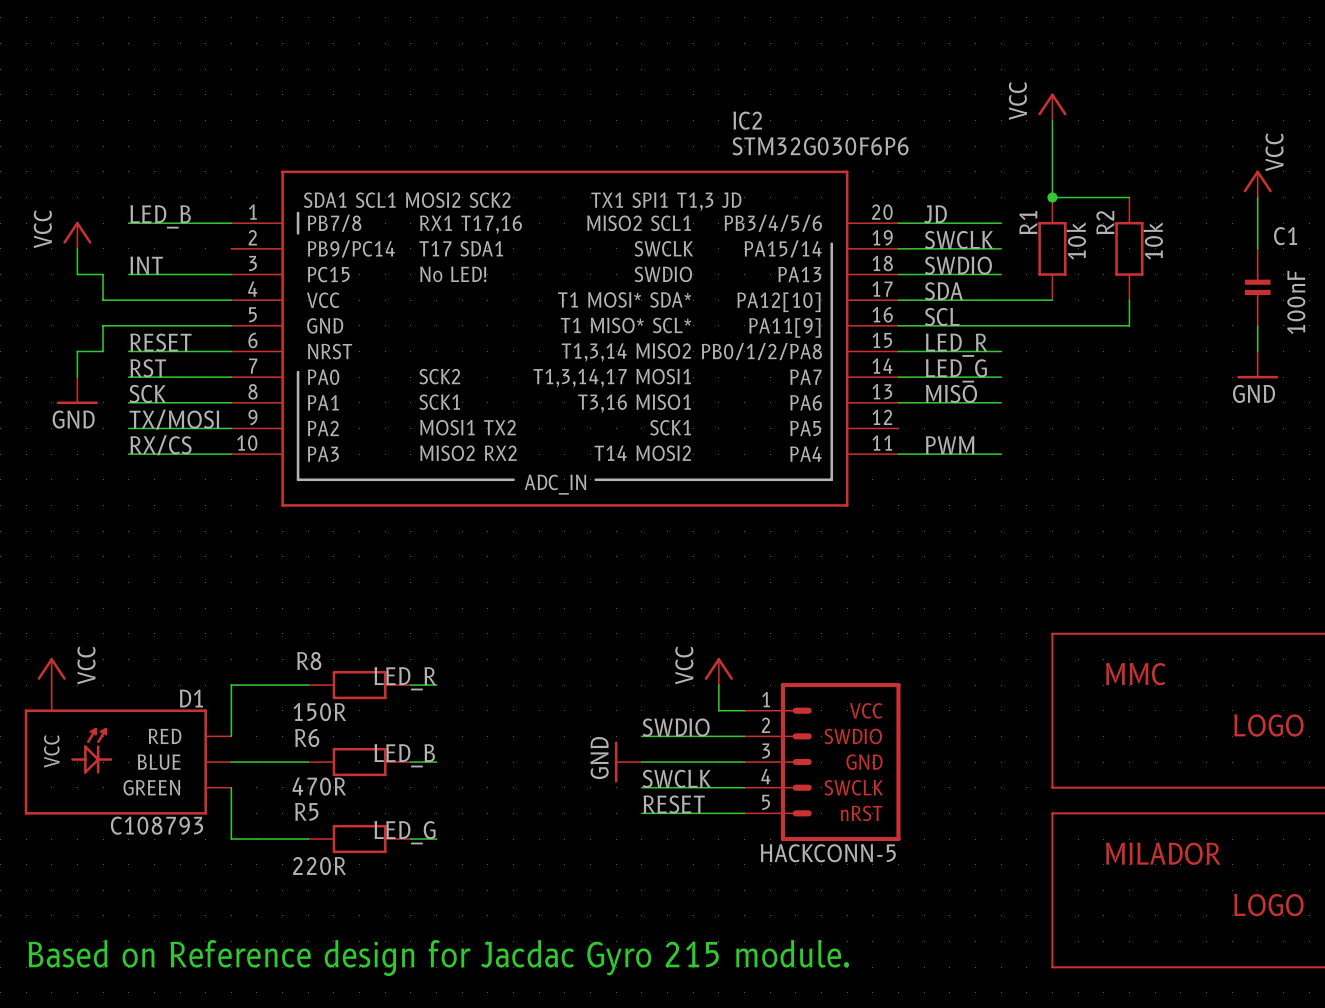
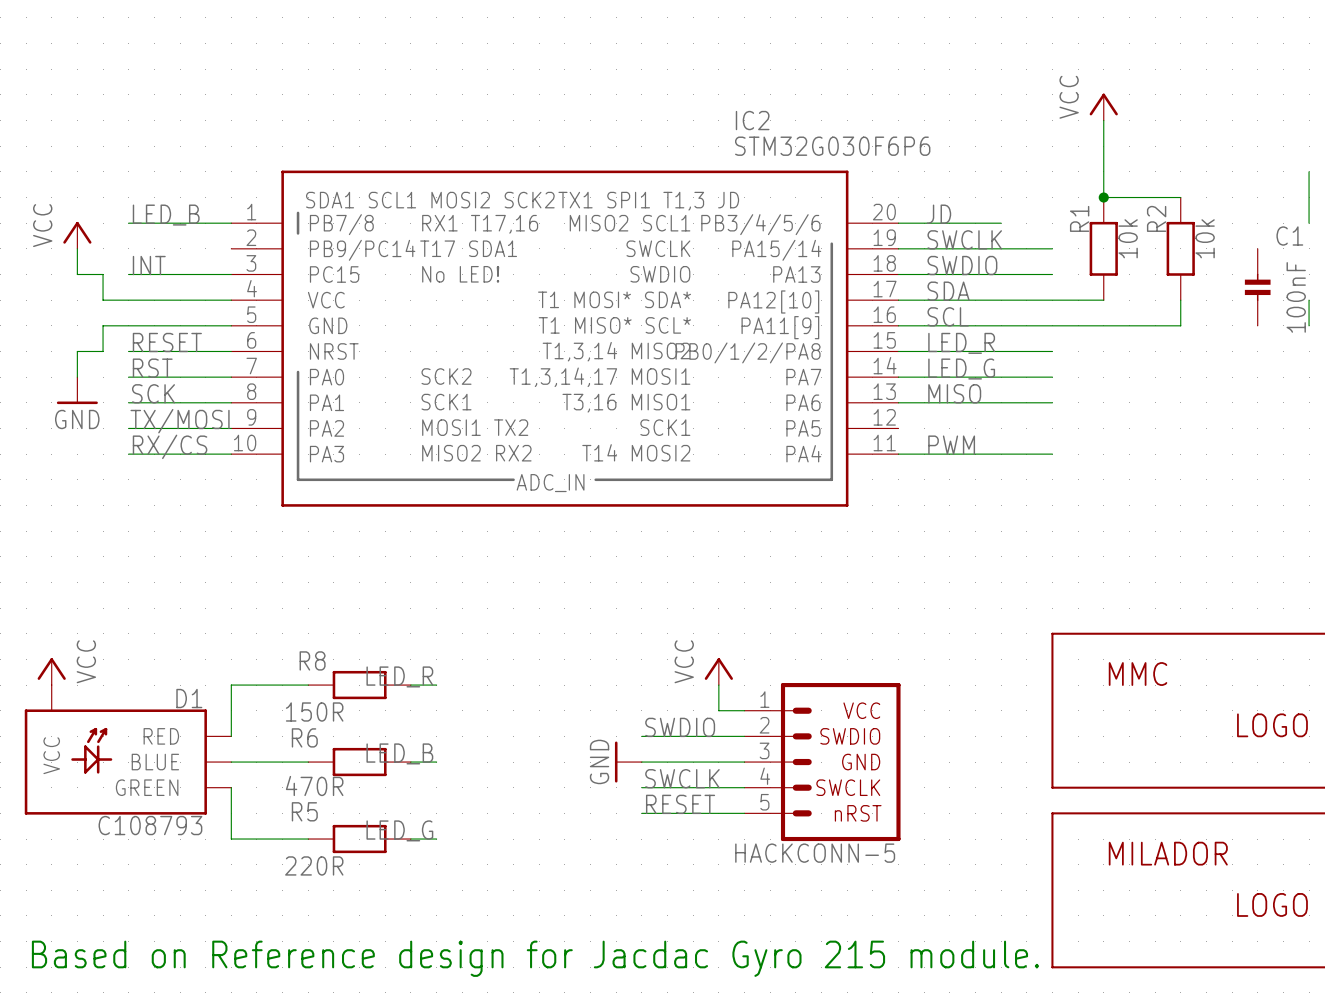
power symbol position: VCC (1052, 107) -> VCC (1103, 107)
wire: (1052, 120) (1052, 197) (1103, 197) -> (1103, 120) (1103, 197)
power symbol: VCC (1257, 184) -> none
junction position: (1052, 197) -> (1103, 197)
wire: none -> (1129, 197) (1180, 197)
wire: (1257, 197) (1257, 248) -> (1309, 171) (1309, 223)
wire: none -> (1001, 248) (1052, 248)
R1 position: (1052, 248) -> (1103, 248)
R2 position: (1129, 248) -> (1180, 248)
wire: none -> (1001, 274) (1052, 274)
wire: none -> (1052, 300) (1103, 300)
wire: (1129, 300) (1129, 325) -> (1180, 300) (1180, 325) (1129, 325)
wire: (1257, 325) (1257, 351) -> (1309, 300) (1309, 325)
wire: none -> (1001, 351) (1052, 351)
power symbol: GND (1257, 364) -> none
wire: none -> (1001, 377) (1052, 377)
wire: none -> (1001, 402) (1052, 402)
wire: none -> (1001, 454) (1052, 454)

